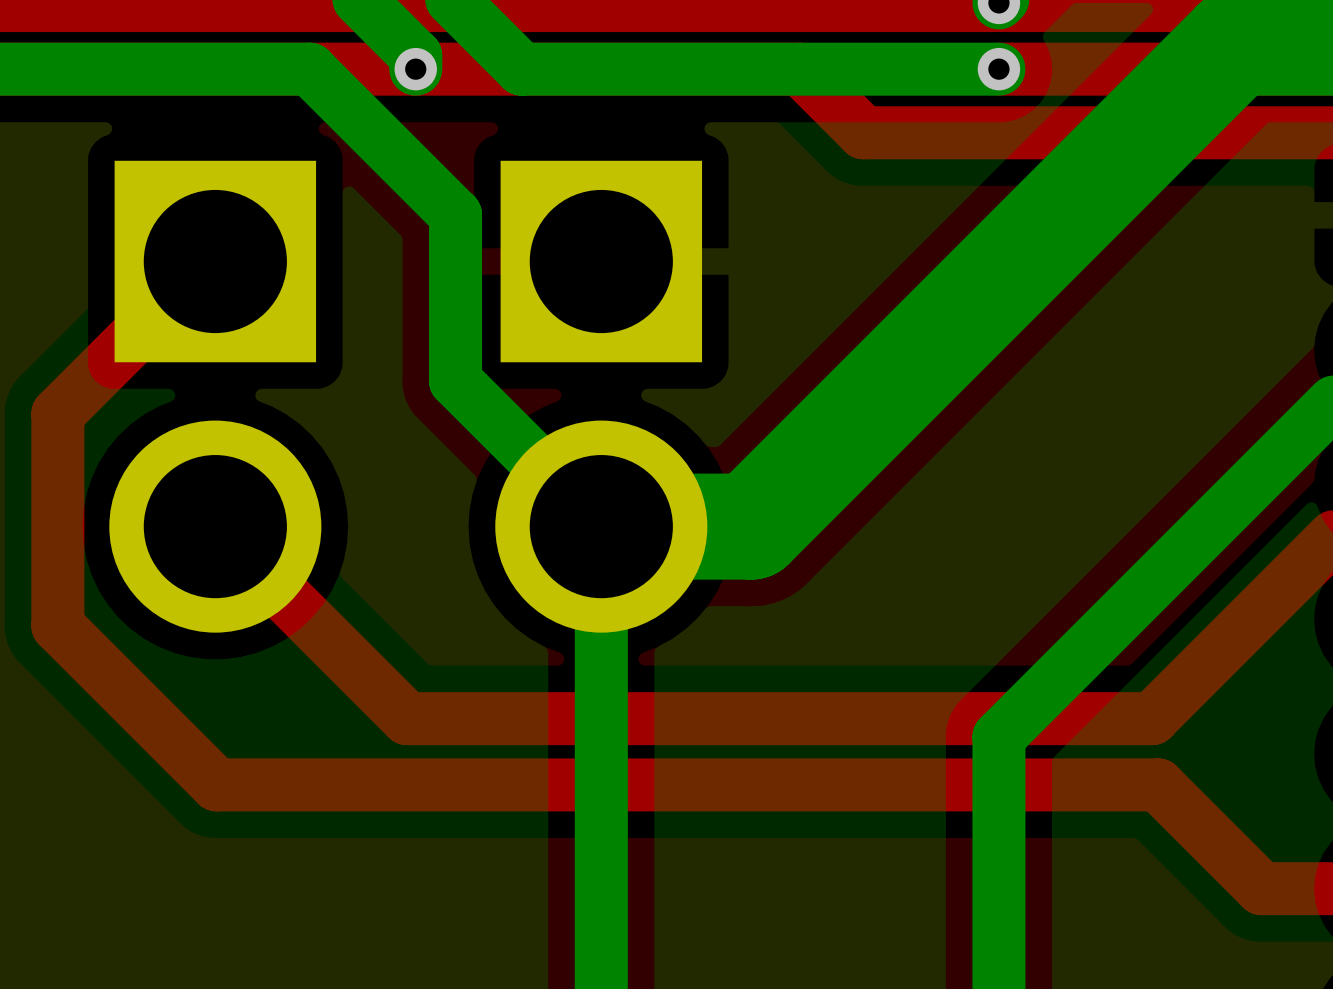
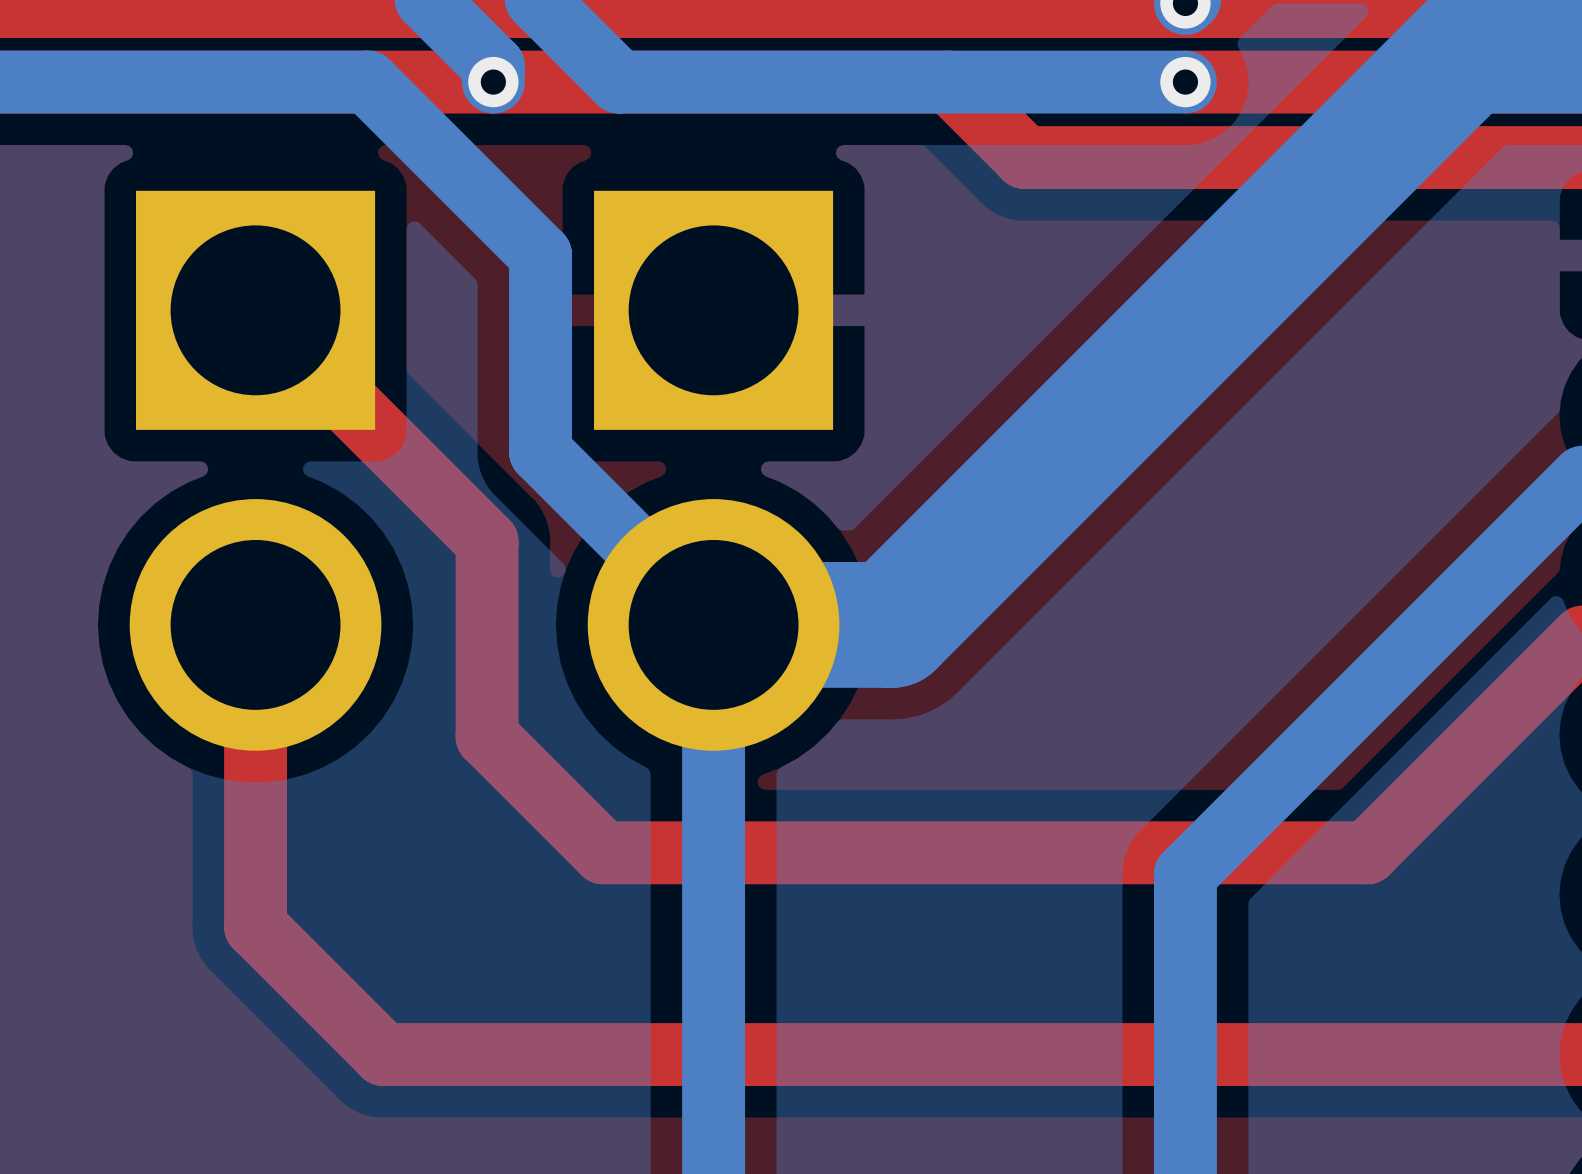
top track: (210, 261) (57, 413) (57, 625) (216, 784) (1158, 784) (1261, 888) -> (255, 624) (255, 926) (383, 1054) (1497, 1054)
top track: (215, 526) (407, 718) (508, 718) -> (255, 310) (487, 541) (487, 736) (603, 852)

